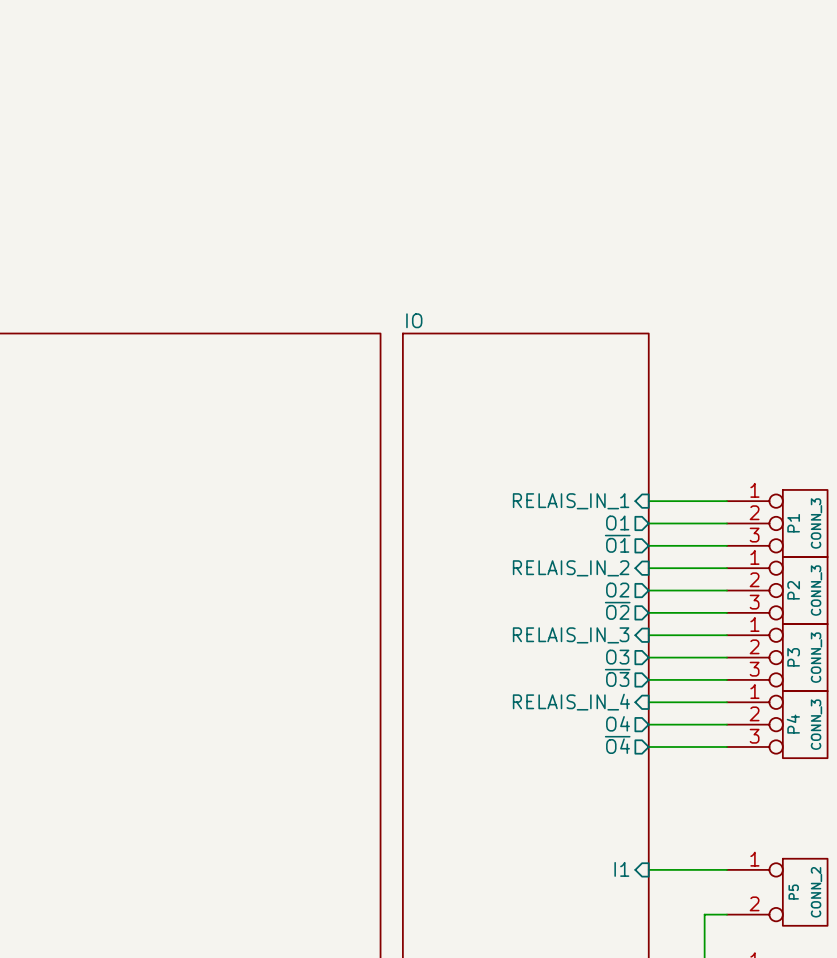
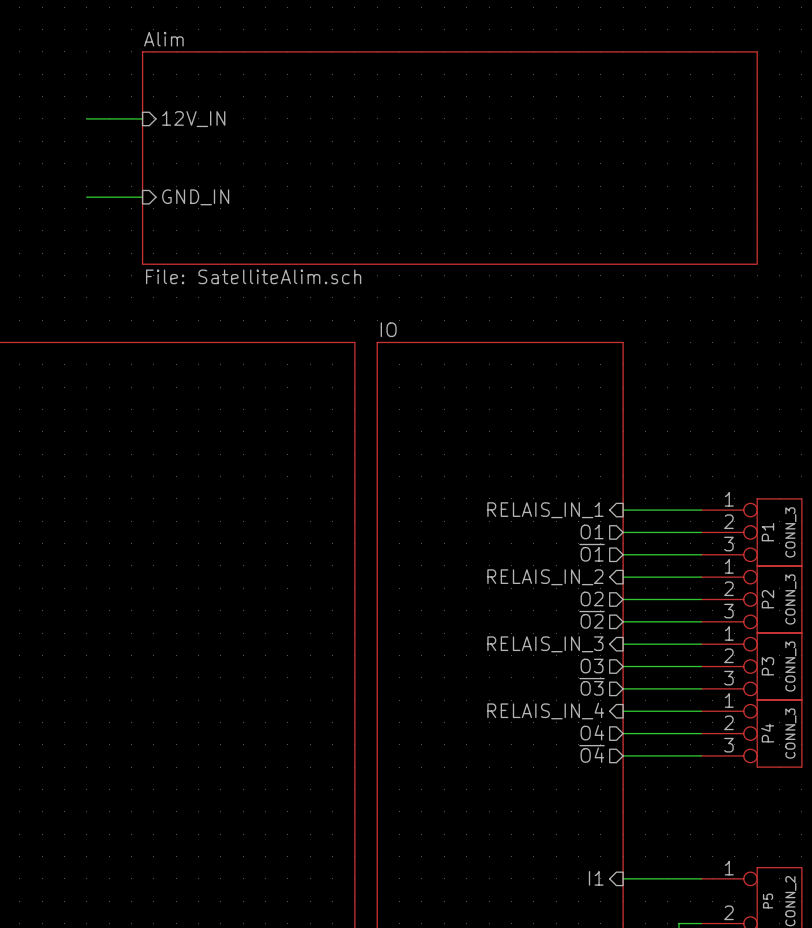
wire: none -> (86, 118) (142, 118)
sheet pin: none -> 12V_IN (193, 119)
sheet Alim: none -> File: SatelliteAlim.sch (449, 158)
wire: none -> (86, 197) (142, 197)
sheet pin: none -> GND_IN (195, 197)

